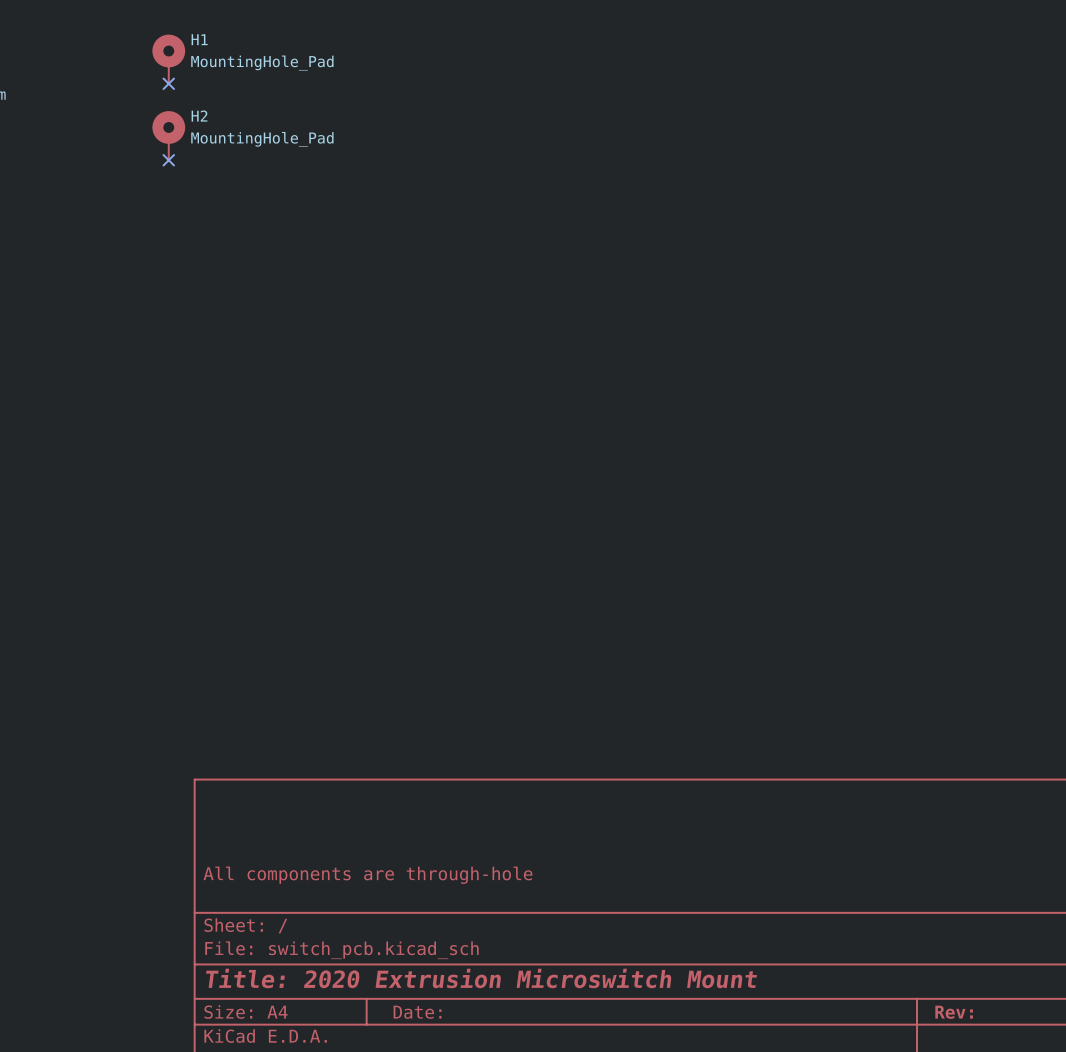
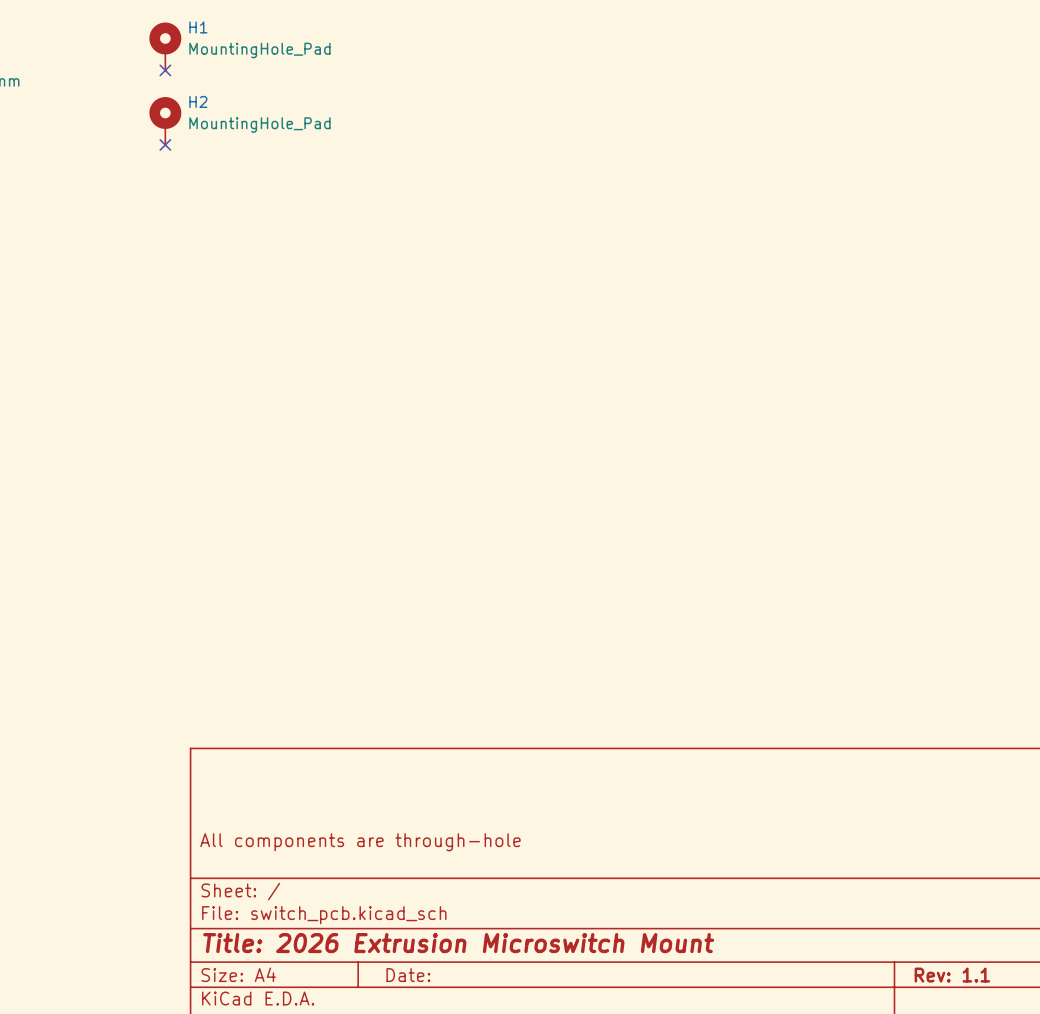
title block: Title: 2020 Extrusion Microswitch Mount (481, 978) -> Title: 2026 Extrusion Microswitch Mount (458, 943)
title block: Rev: (954, 1012) -> Rev: 1.1 (952, 975)

